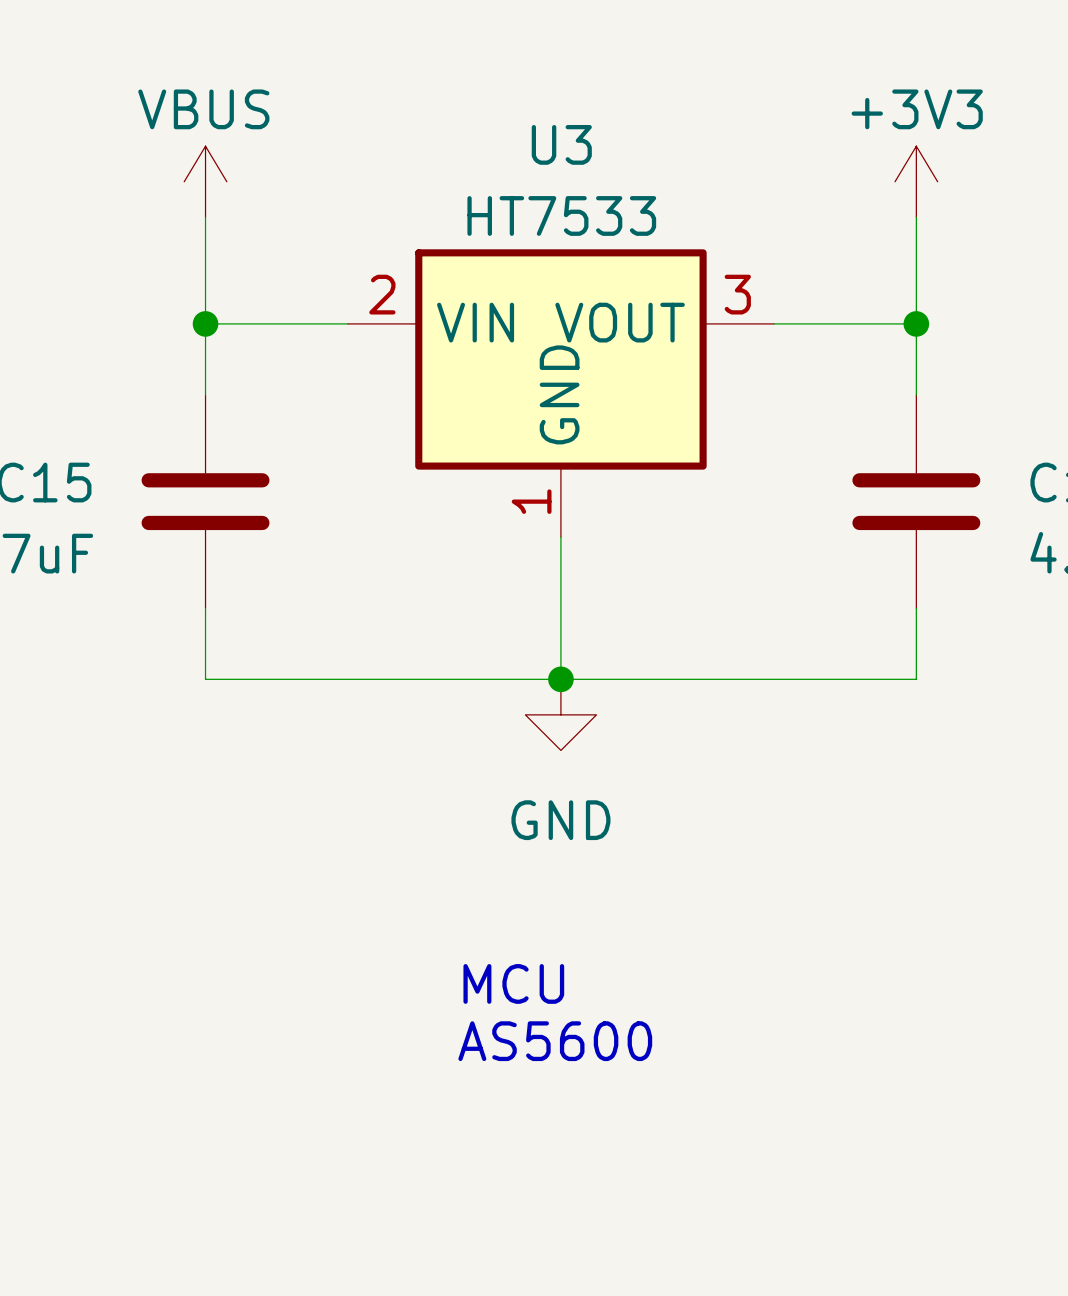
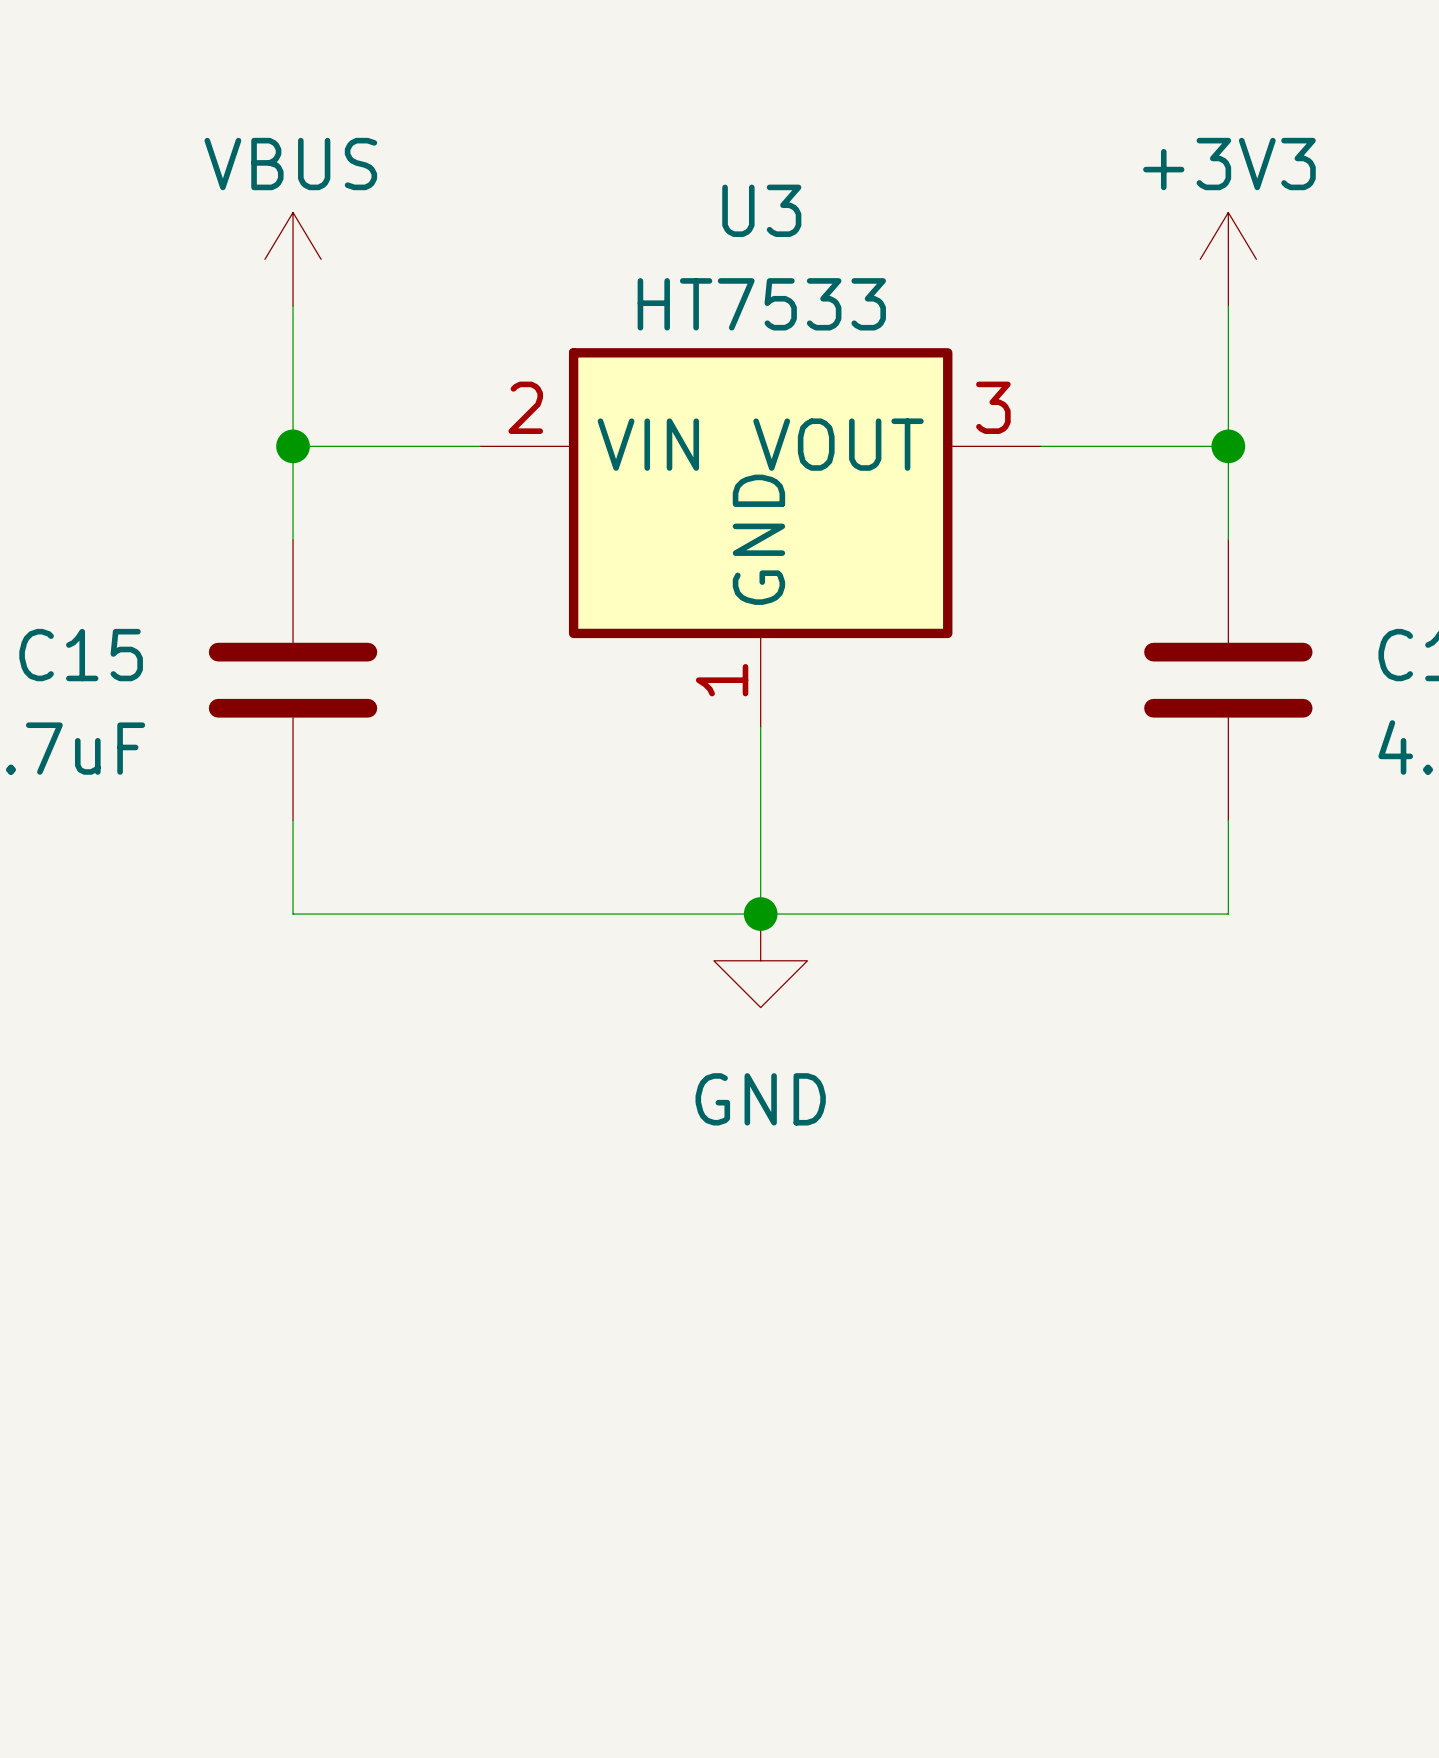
text: MCU (513, 983) -> none
text: AS5600 (555, 1041) -> none

